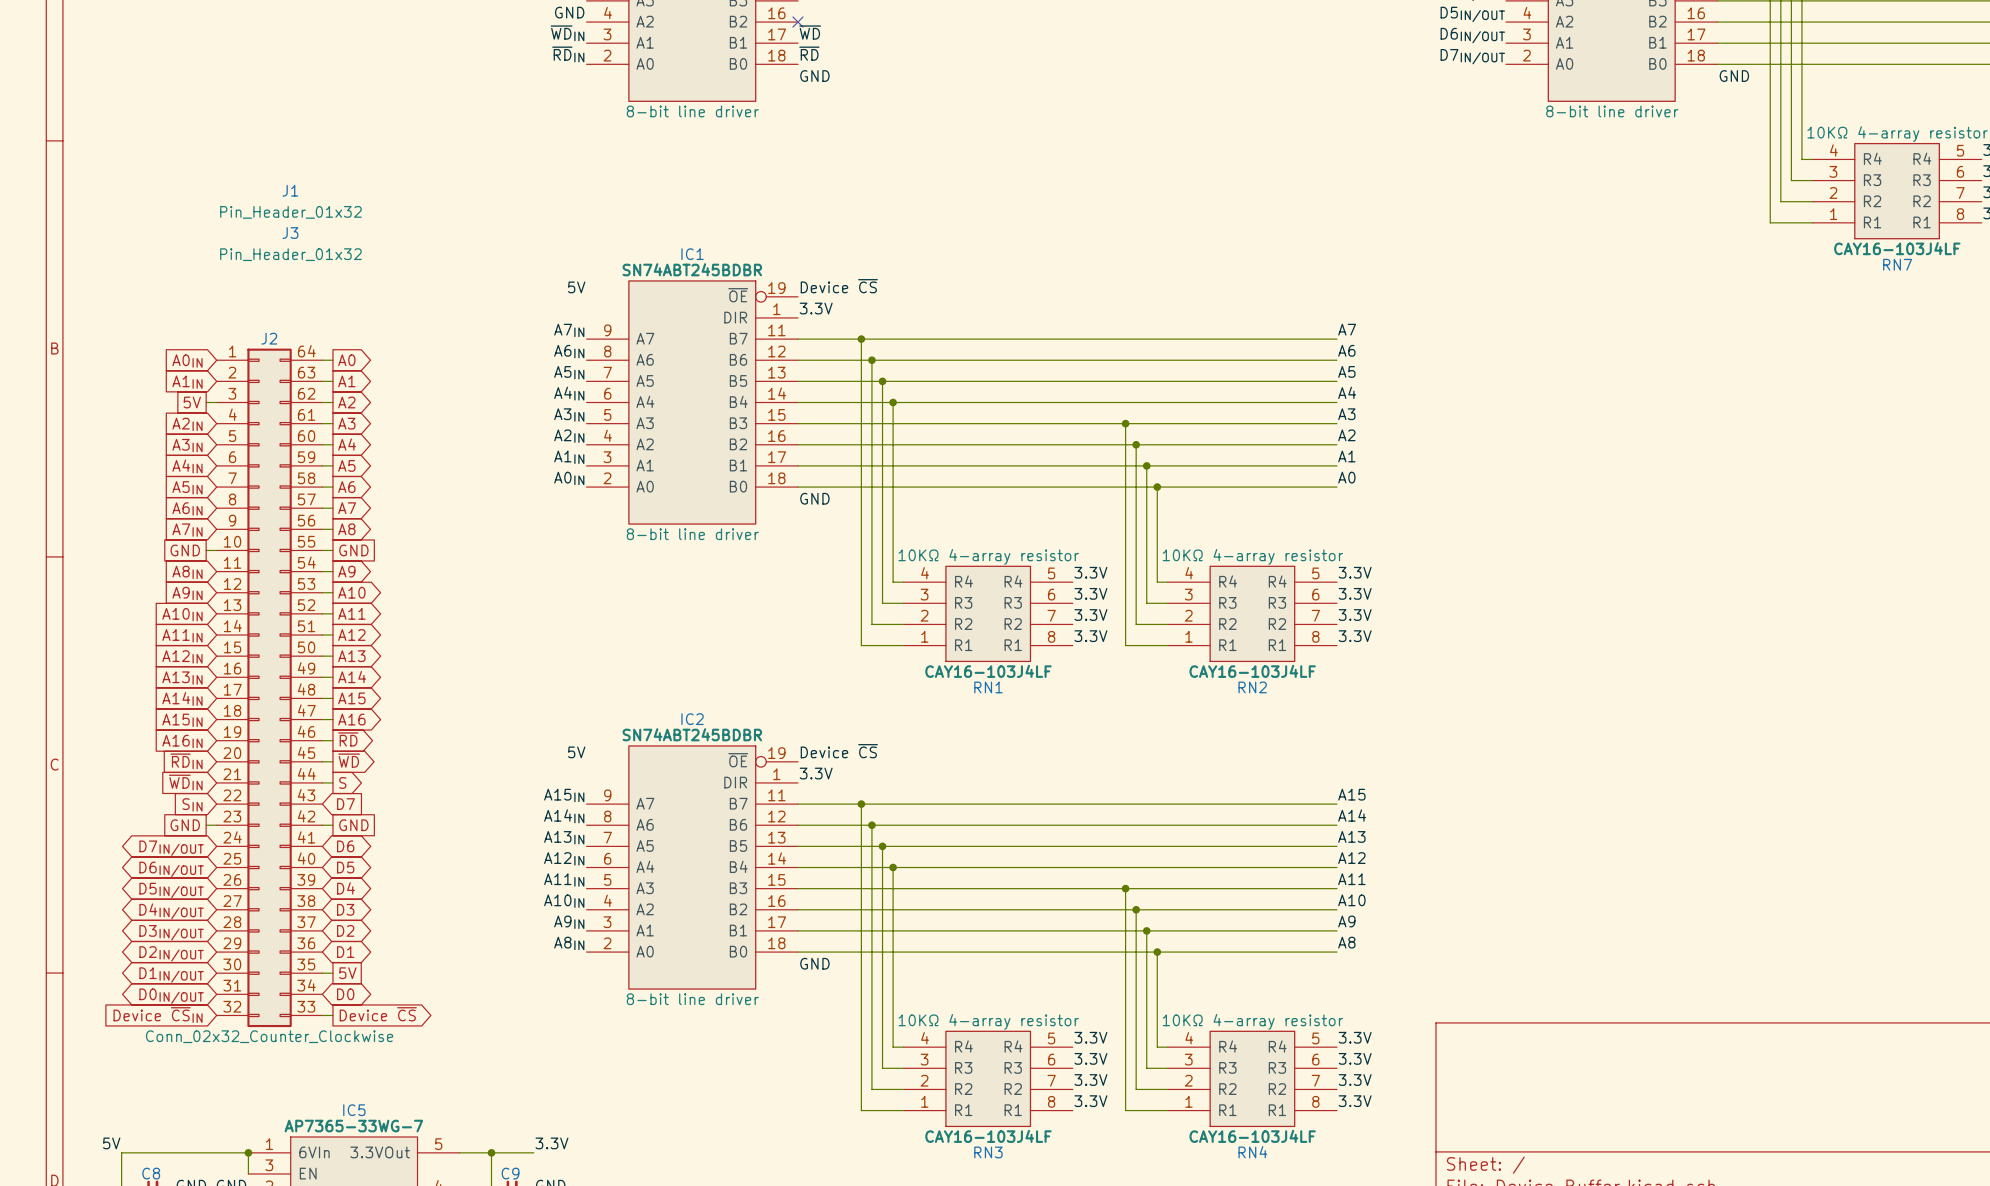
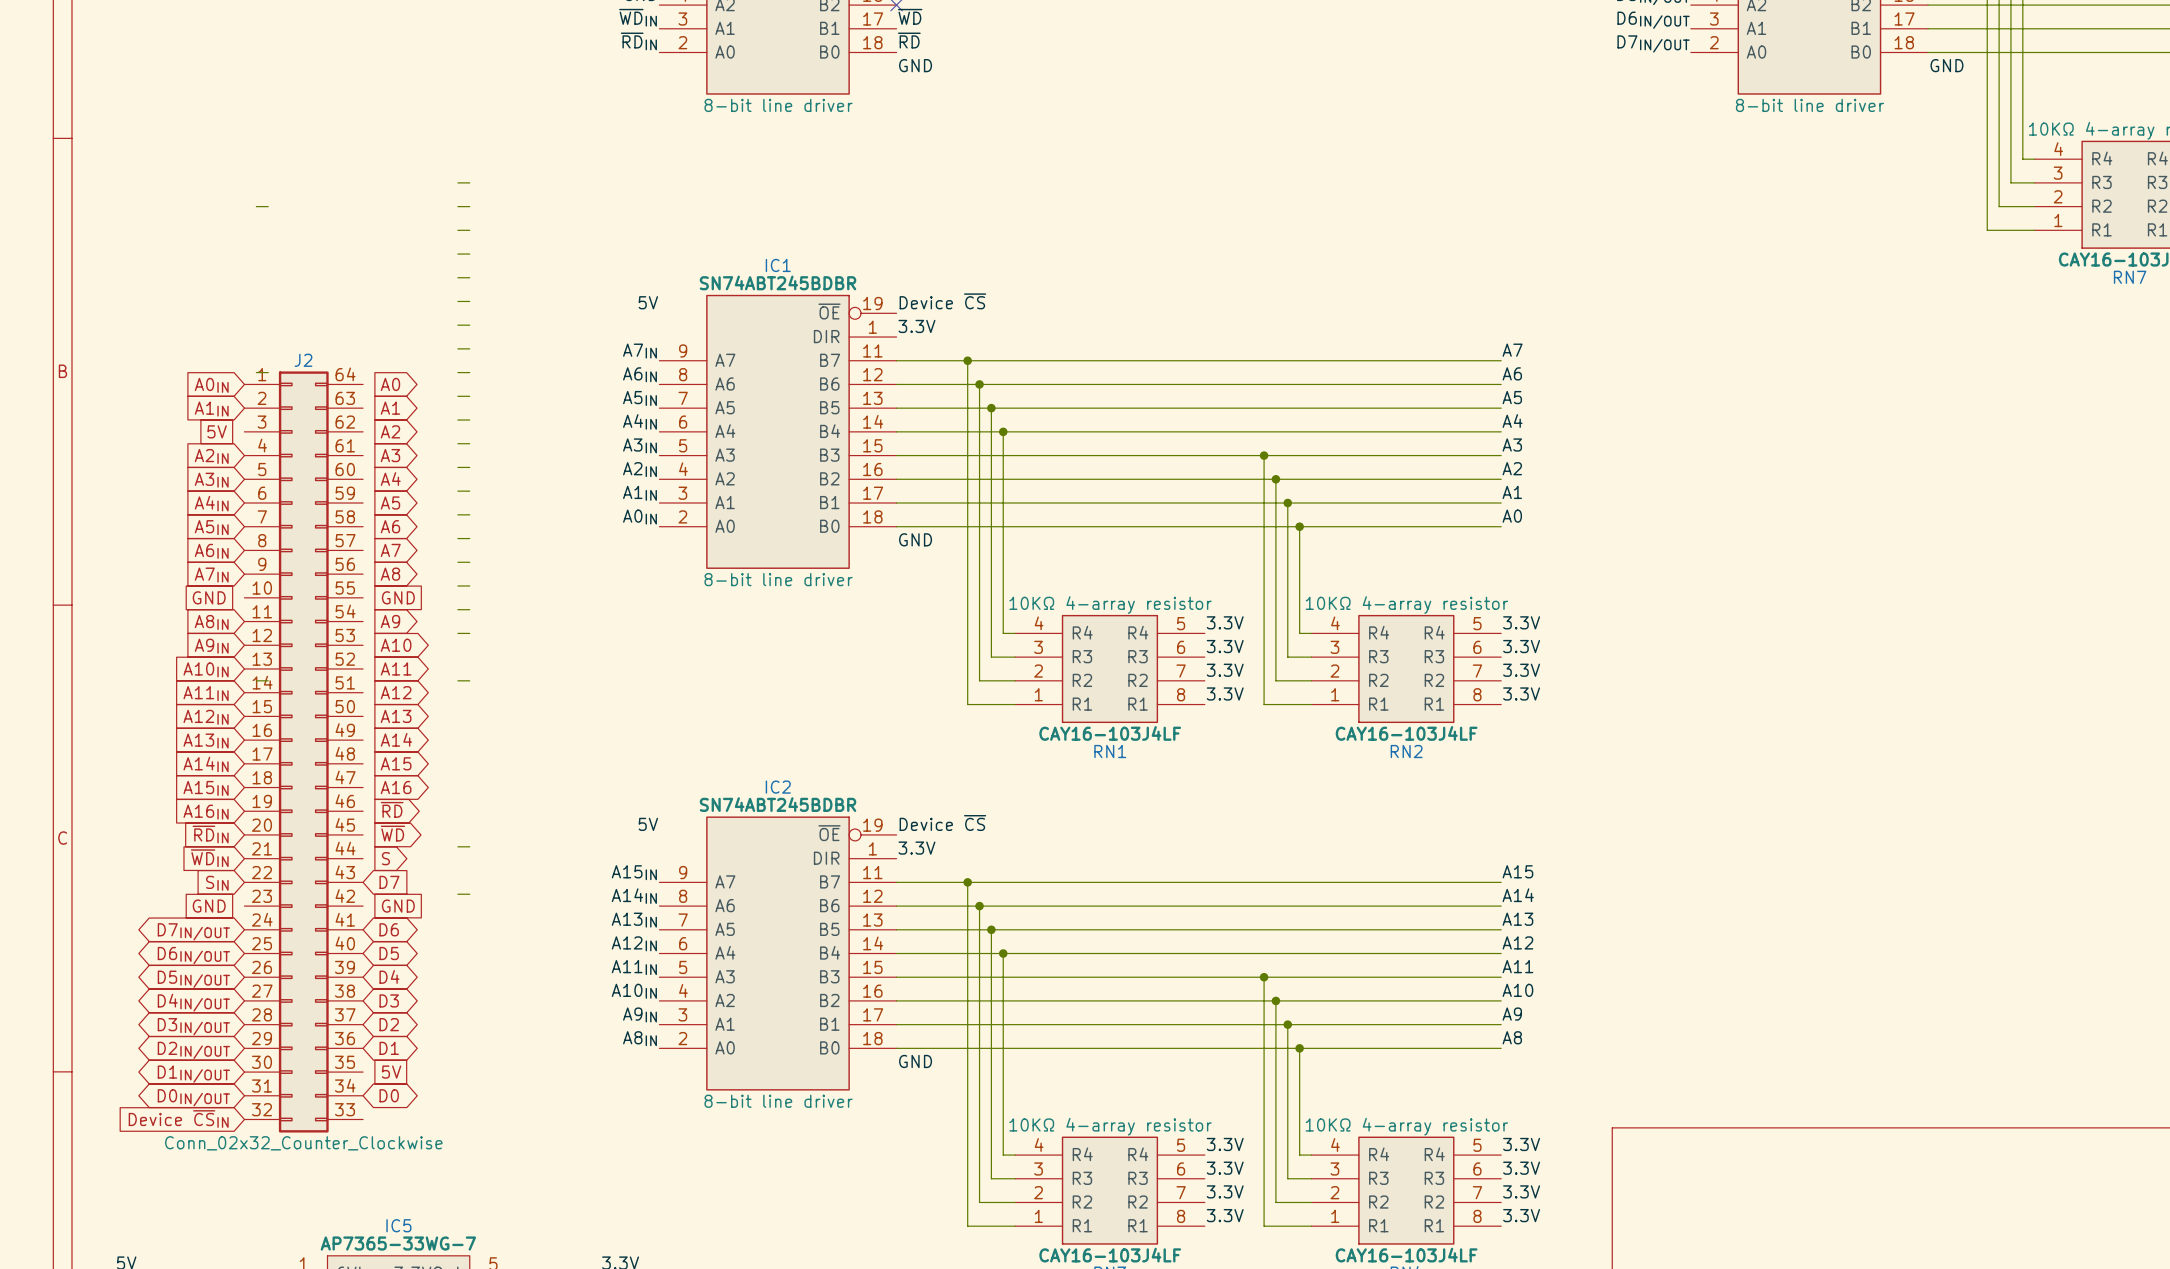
wire: none -> (457, 182) (469, 182)
J1: Pin_Header_01x32 (290, 201) -> none
J3: Pin_Header_01x32 (290, 244) -> none
wire: (322, 360) (332, 360) -> (457, 206) (469, 206)
wire: (322, 381) (332, 381) -> (457, 230) (469, 230)
wire: (206, 402) (216, 402) -> (256, 206) (268, 206)
wire: (322, 402) (332, 402) -> (457, 254) (469, 254)
wire: (322, 423) (332, 423) -> (457, 277) (469, 277)
wire: (322, 444) (332, 444) -> (457, 301) (469, 301)
wire: (322, 465) (332, 465) -> (457, 325) (469, 325)
wire: (322, 487) (332, 487) -> (457, 348) (469, 348)
wire: (322, 508) (332, 508) -> (457, 372) (469, 372)
wire: (322, 529) (332, 529) -> (457, 396) (469, 396)
wire: (206, 550) (216, 550) -> (256, 372) (268, 372)
wire: (322, 550) (332, 550) -> (457, 420) (469, 420)
wire: (322, 571) (332, 571) -> (457, 443) (469, 443)
wire: (322, 592) (332, 592) -> (457, 467) (469, 467)
wire: (322, 613) (332, 613) -> (457, 491) (469, 491)
wire: (322, 635) (332, 635) -> (457, 514) (469, 514)
wire: (322, 656) (332, 656) -> (457, 538) (469, 538)
wire: (322, 677) (332, 677) -> (457, 562) (469, 562)
wire: (322, 698) (332, 698) -> (457, 585) (469, 585)
wire: (322, 719) (332, 719) -> (457, 609) (469, 609)
wire: (322, 740) (332, 740) -> (457, 633) (469, 633)
wire: (322, 761) (332, 761) -> none
wire: (322, 782) (332, 782) -> (457, 680) (469, 680)
wire: (206, 825) (216, 825) -> (256, 680) (268, 680)
wire: (322, 825) (332, 825) -> (457, 846) (469, 846)
wire: (322, 973) (332, 973) -> (457, 894) (469, 894)
global label: Device ~{CS} (378, 1014) -> none
wire: (322, 1015) (332, 1015) -> none

